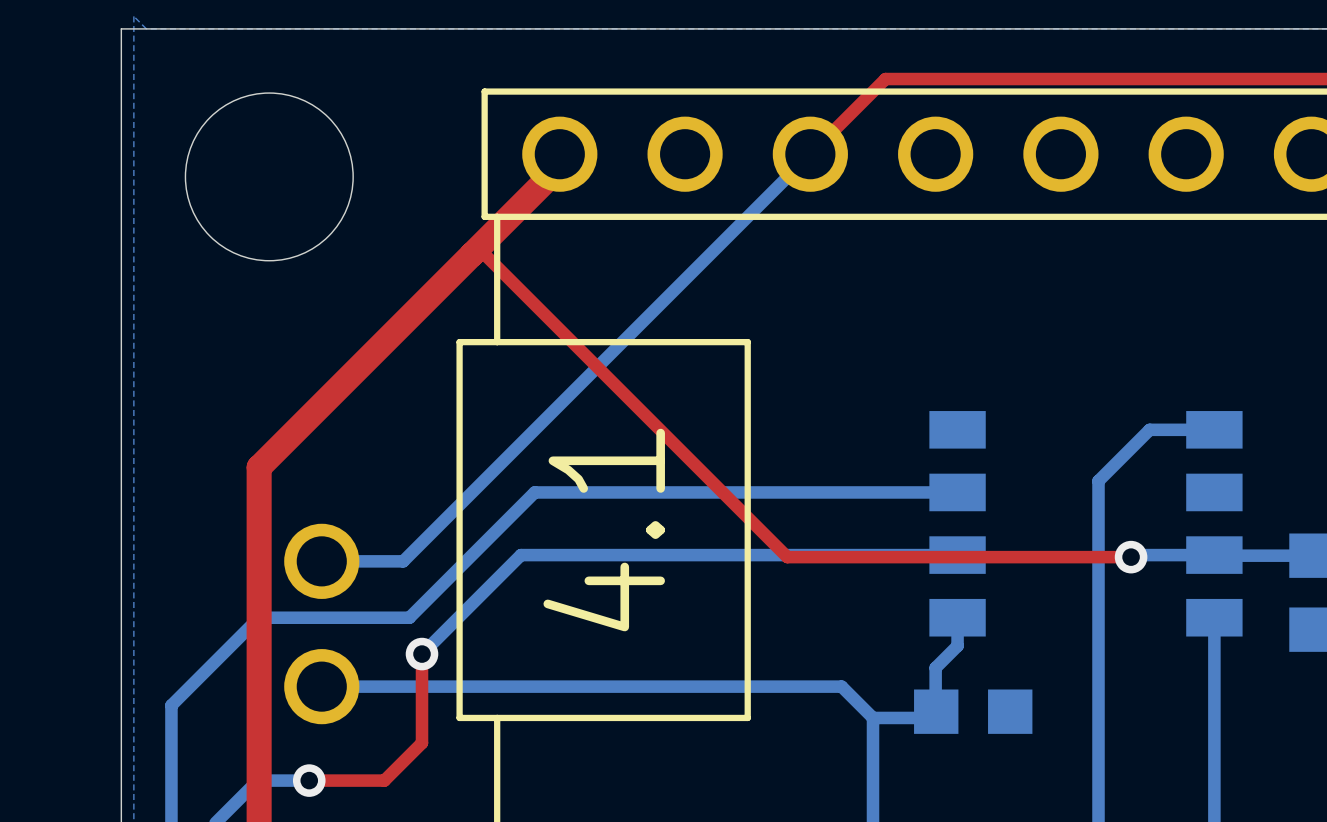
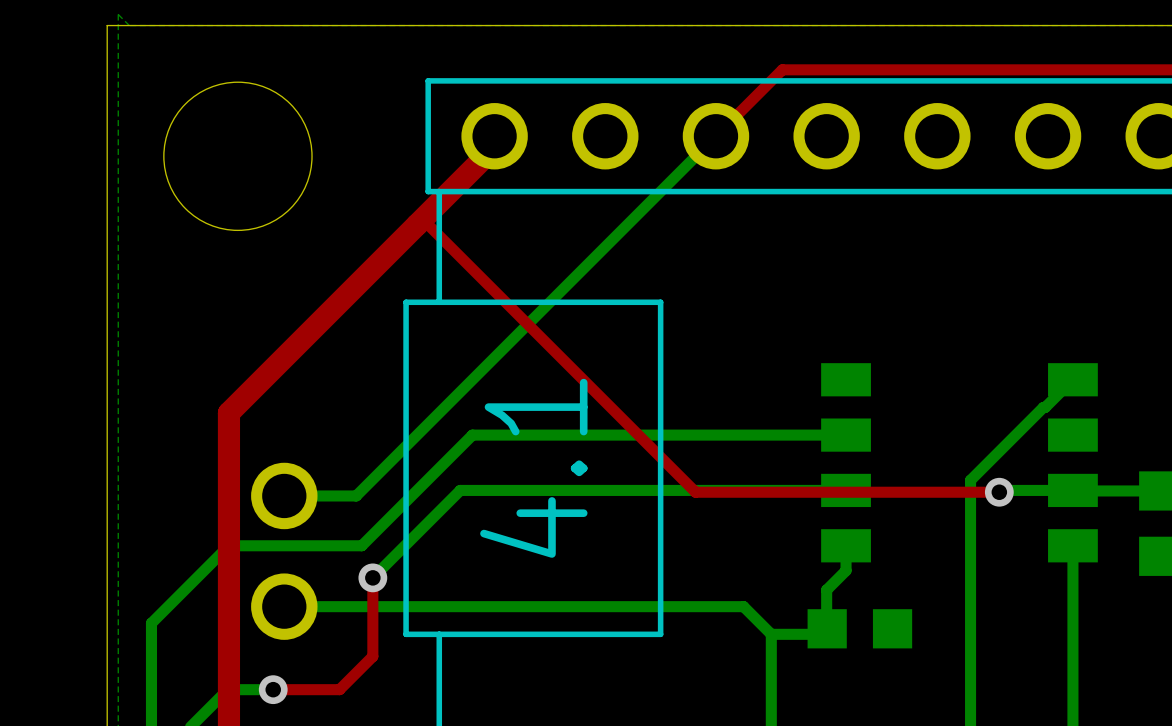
bottom track: (1214, 429) (1149, 429) (1098, 481) (1098, 543) -> (1072, 379) (970, 480)

